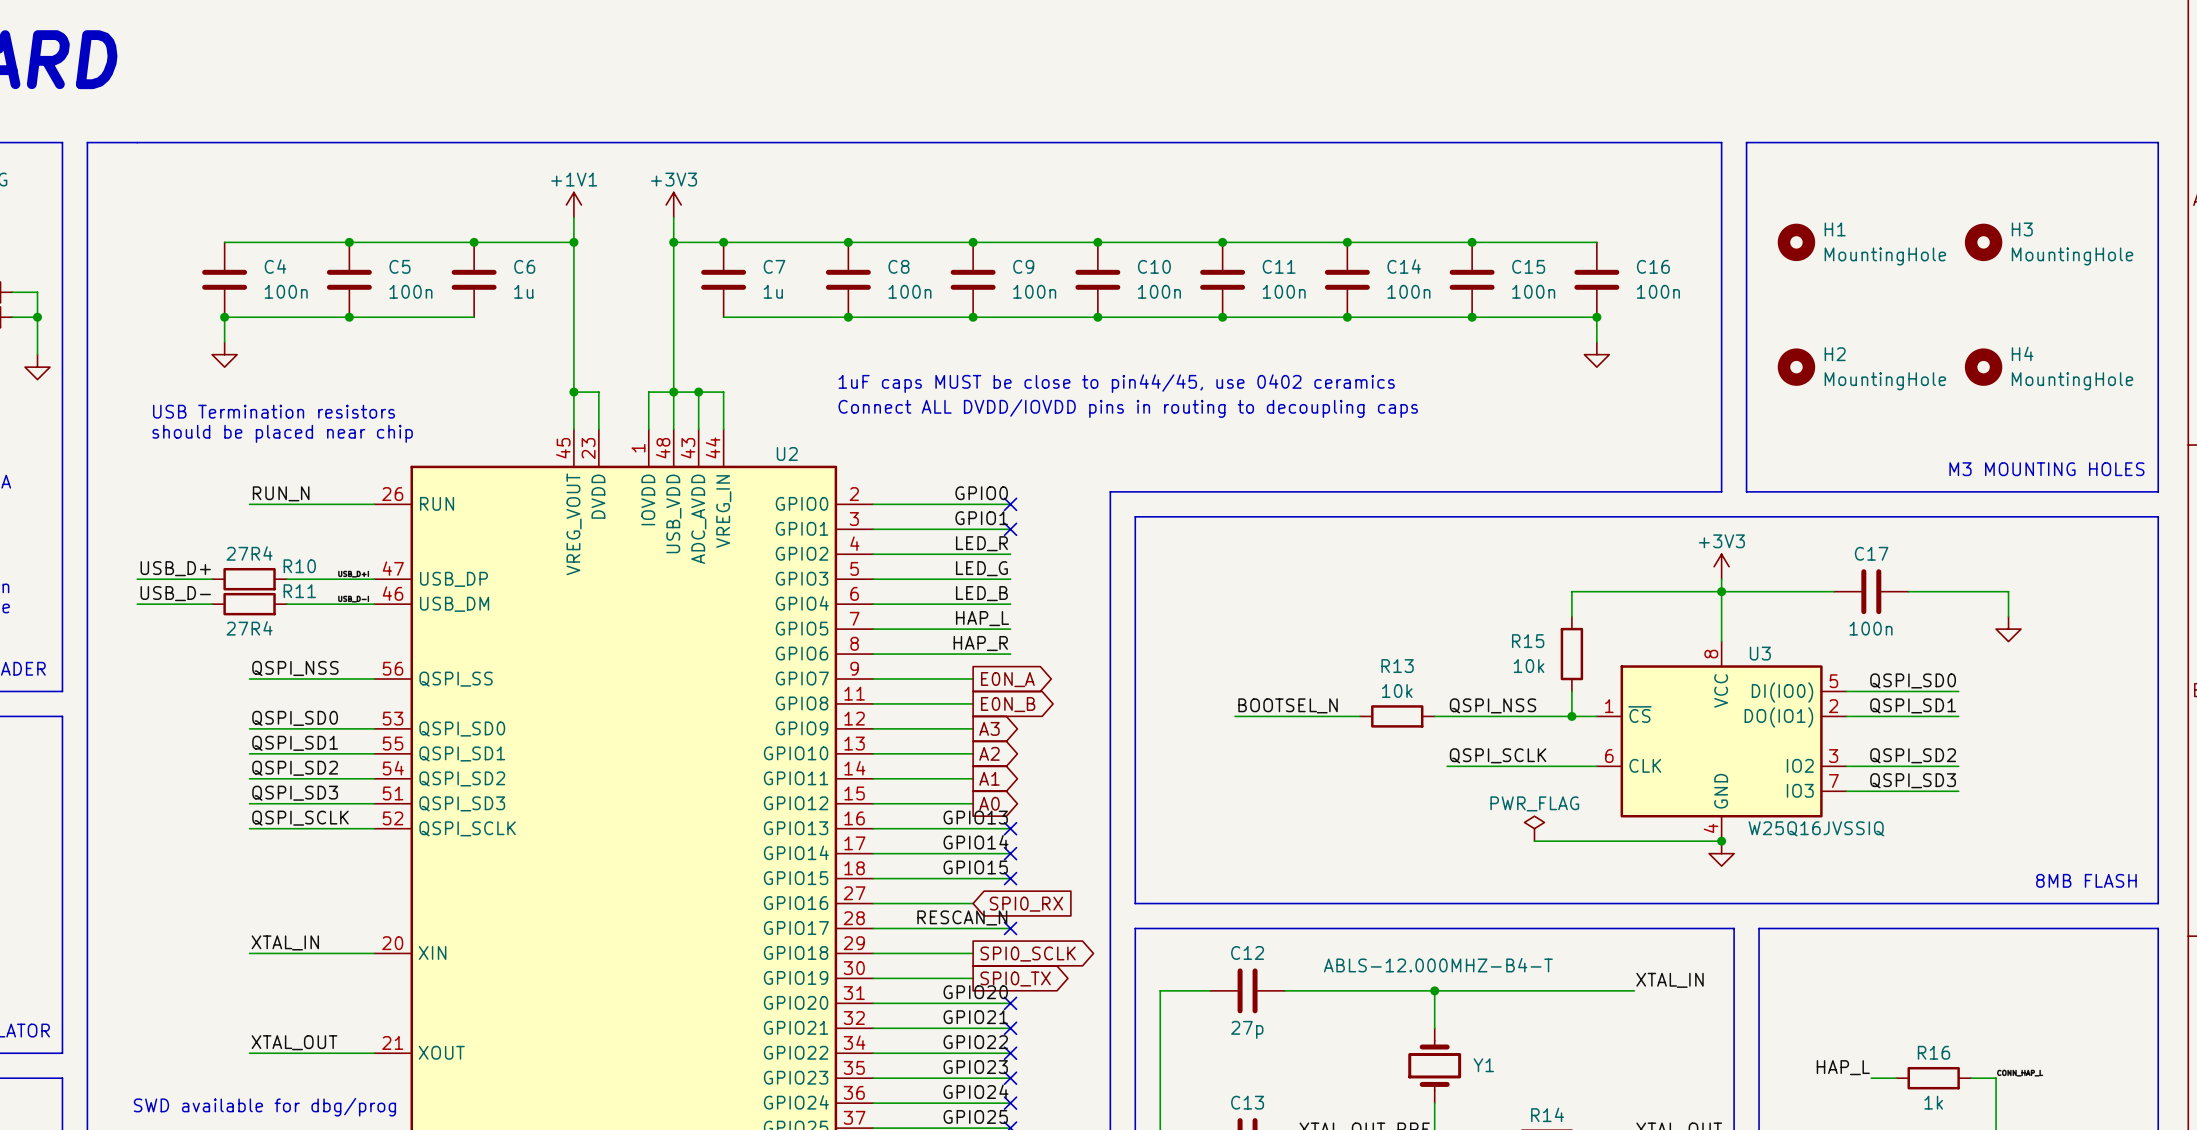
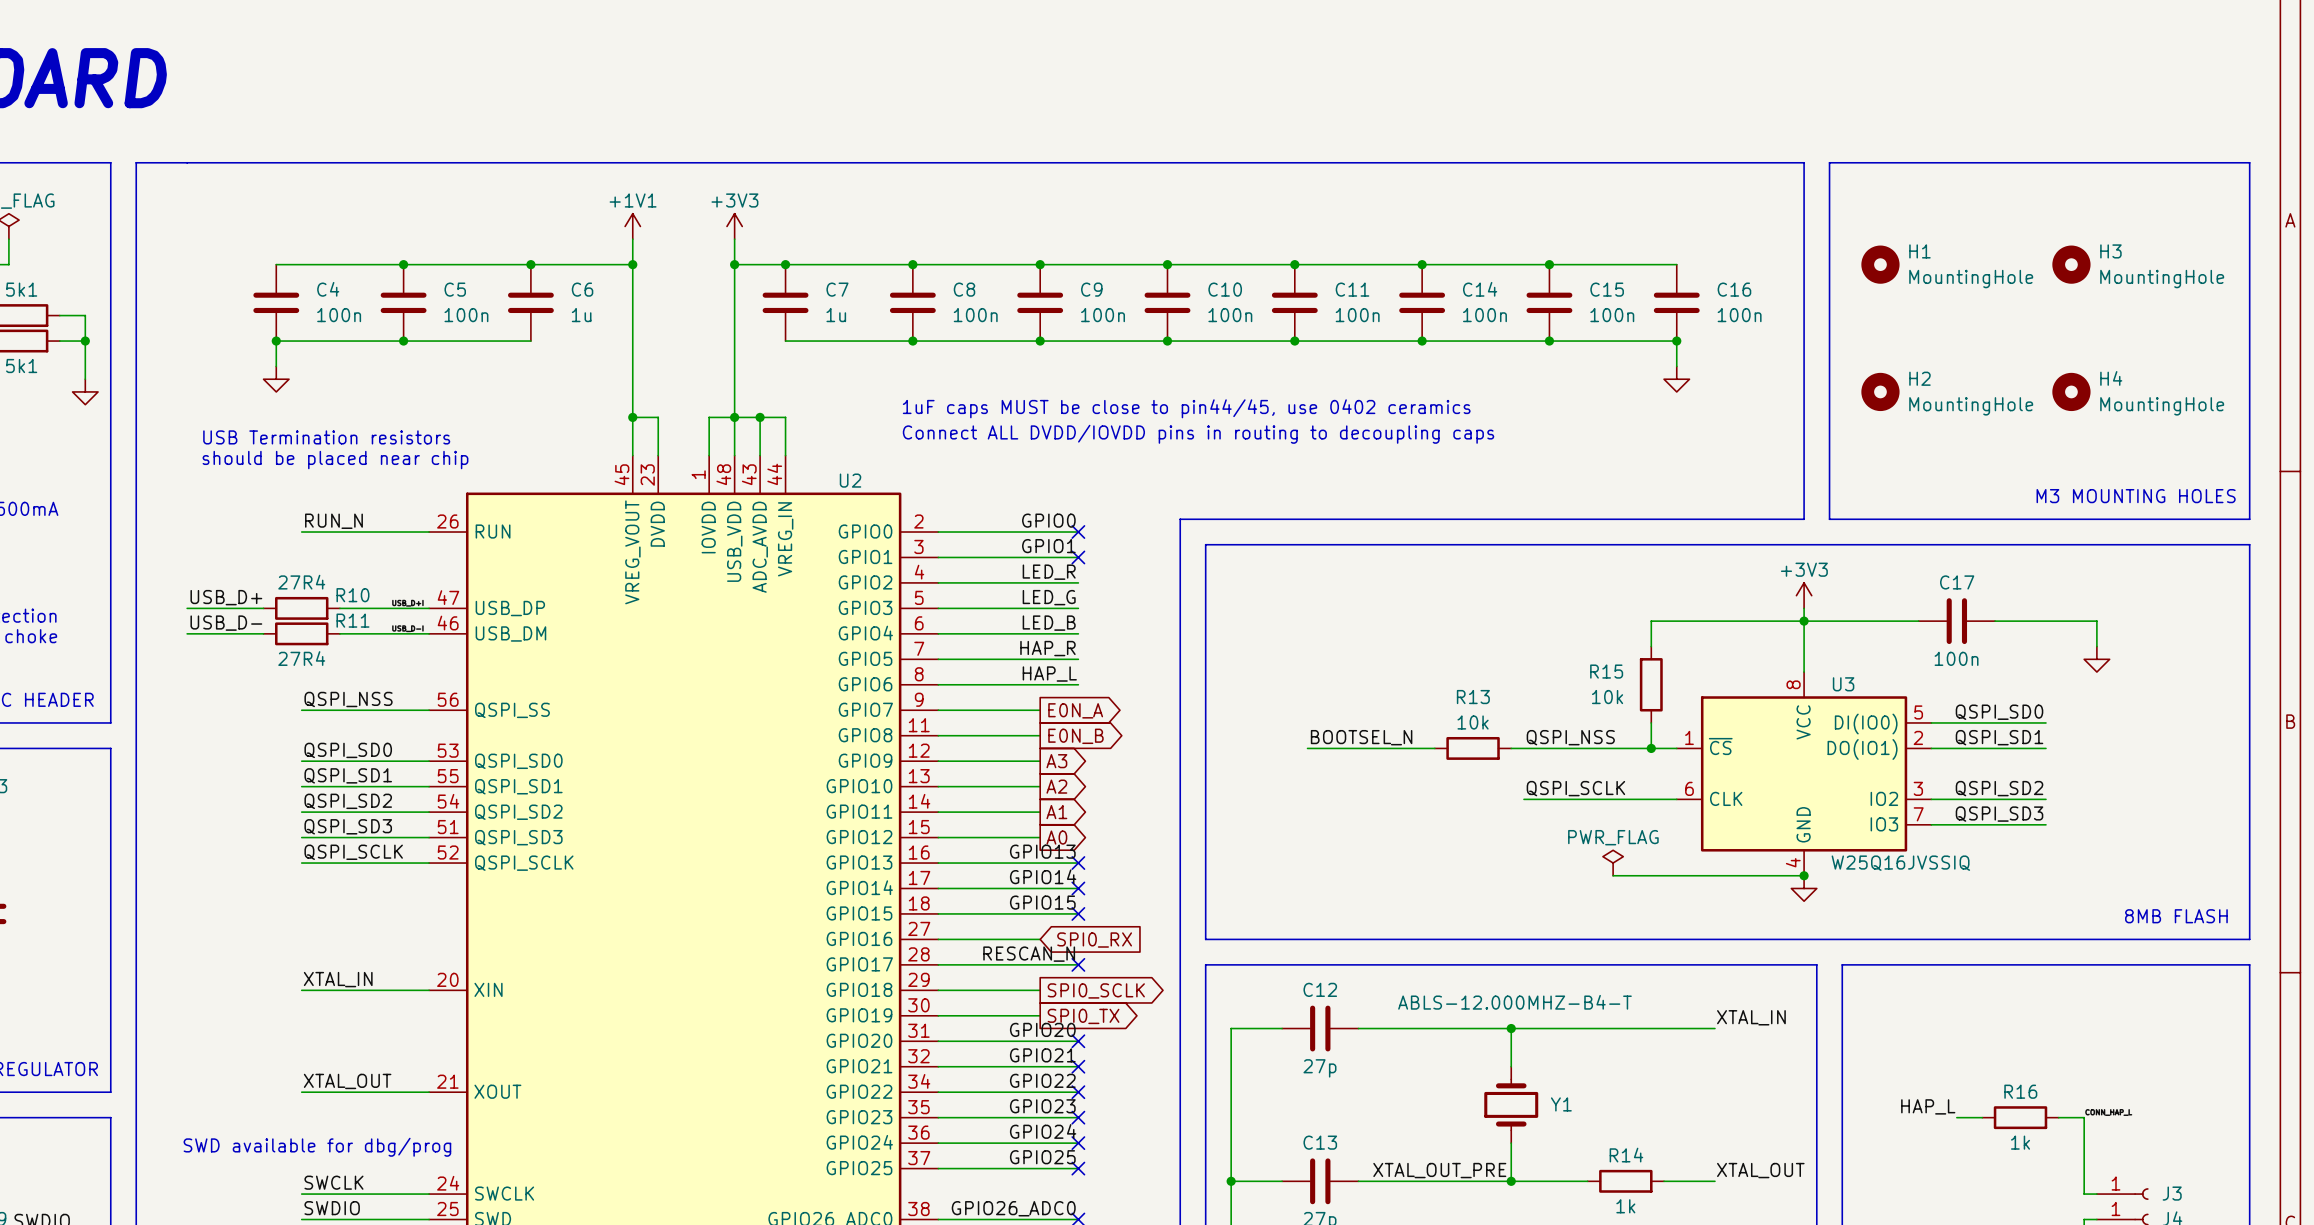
label: HAP_L (982, 618) -> HAP_R (1047, 648)
label: HAP_R (980, 643) -> HAP_L (1049, 674)

